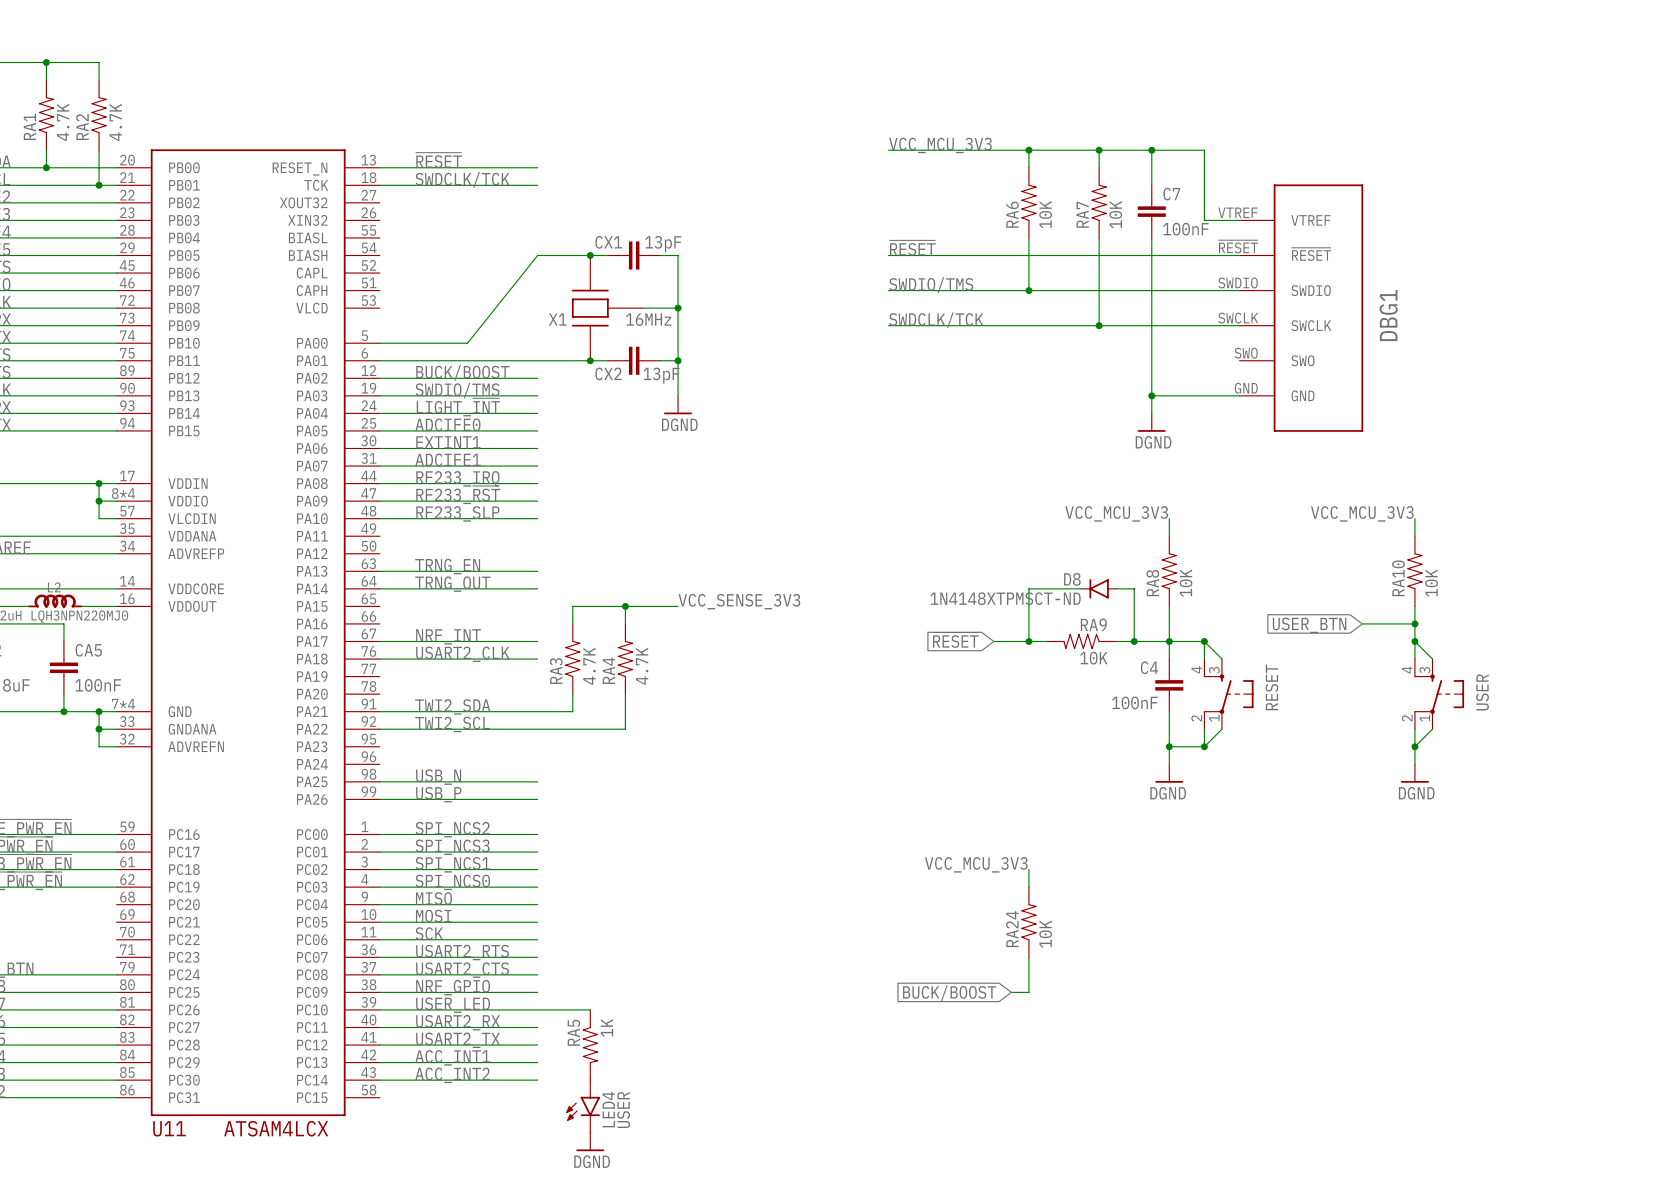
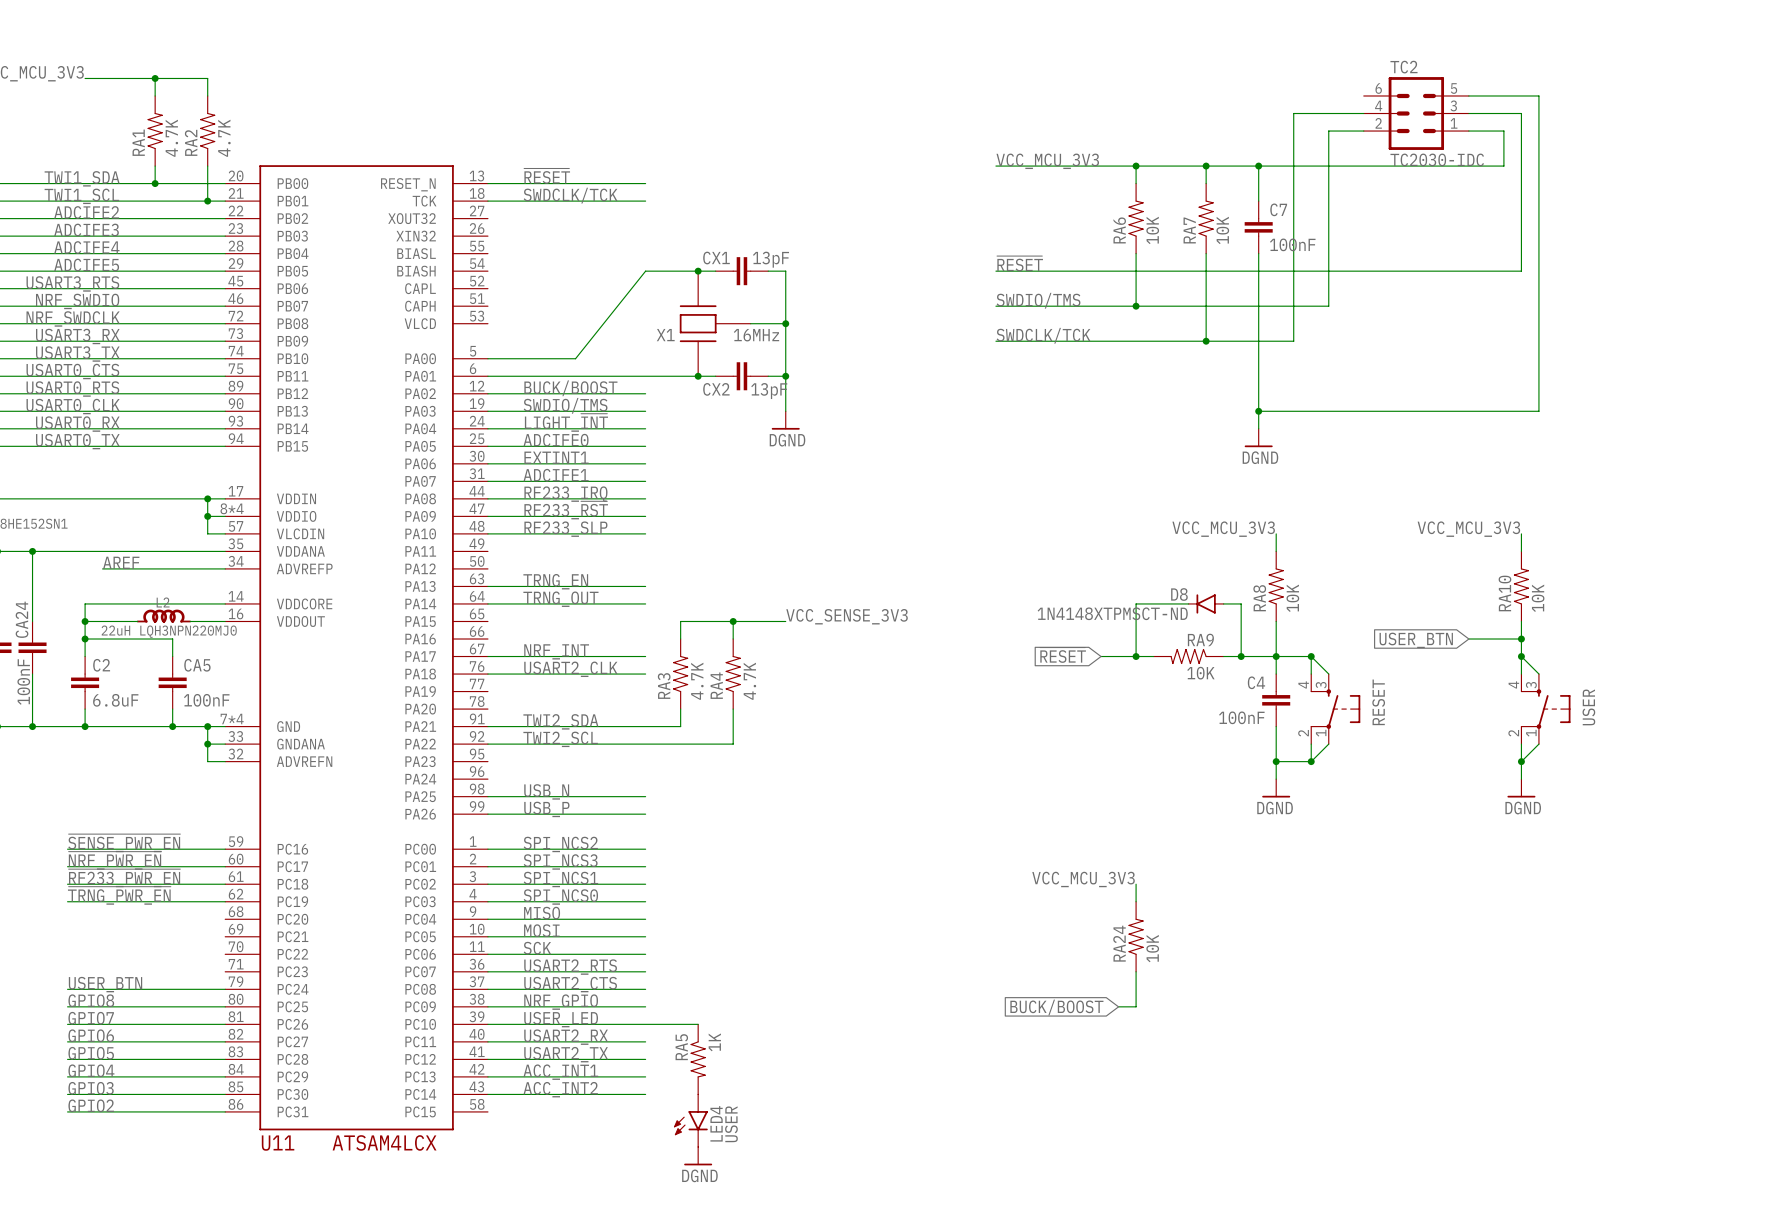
wire: none -> (1468, 95) (1538, 95) (1538, 411) (1346, 411)
TC2: none -> TC2030-IDC (1416, 113)
wire: none -> (1468, 113) (1521, 113) (1521, 271) (1346, 271)
wire: (1204, 150) (1204, 220) (1239, 220) -> (1311, 166) (1503, 166) (1503, 131) (1468, 131)
wire: (1221, 290) (1239, 290) -> (1328, 306) (1328, 131) (1363, 131)
DBG1: (1301, 308) -> none
wire: (1186, 325) (1239, 325) -> (1293, 341) (1293, 113) (1363, 113)

